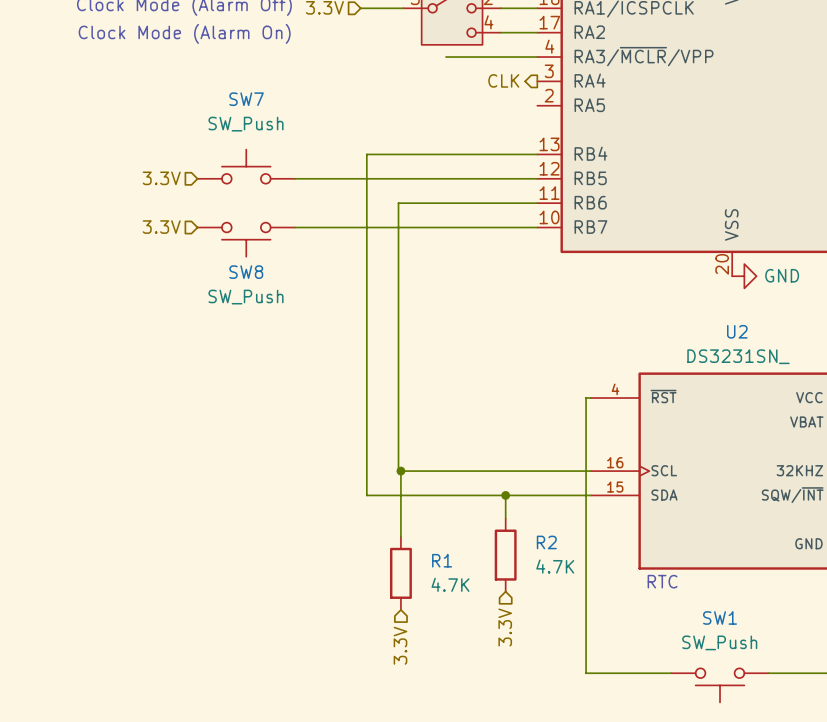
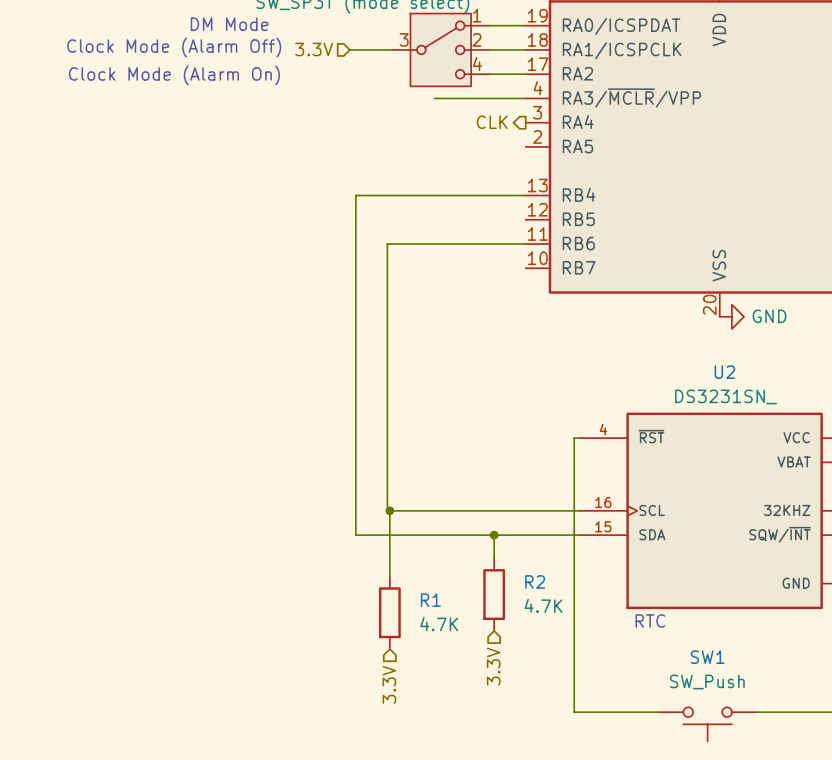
SW7: SW_Push (246, 166) -> none
hierarchical label: 3.3V (161, 178) -> none
wire: (294, 178) (537, 178) -> none
hierarchical label: 3.3V (161, 227) -> none
wire: (294, 227) (537, 227) -> none
SW8: SW_Push (246, 239) -> none

